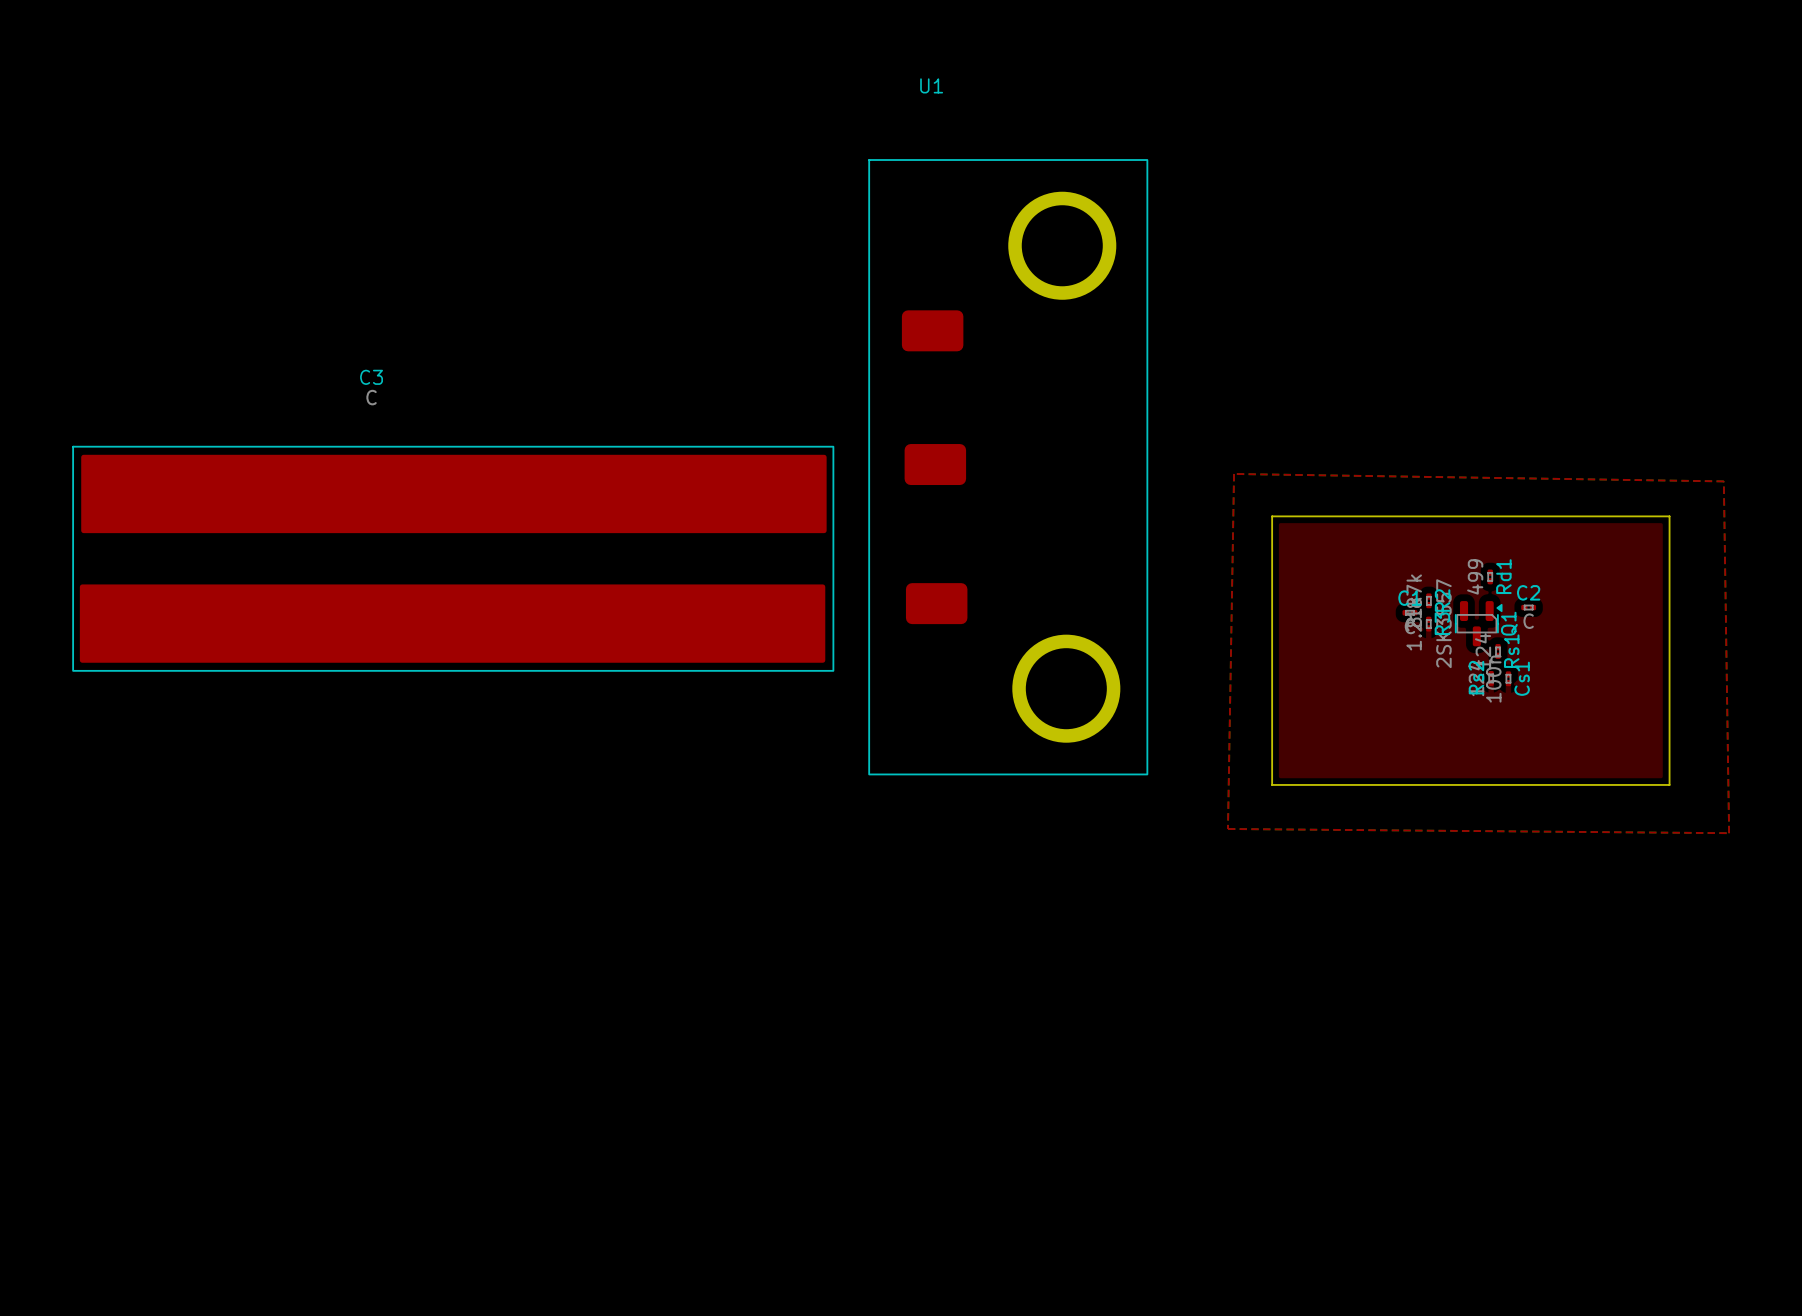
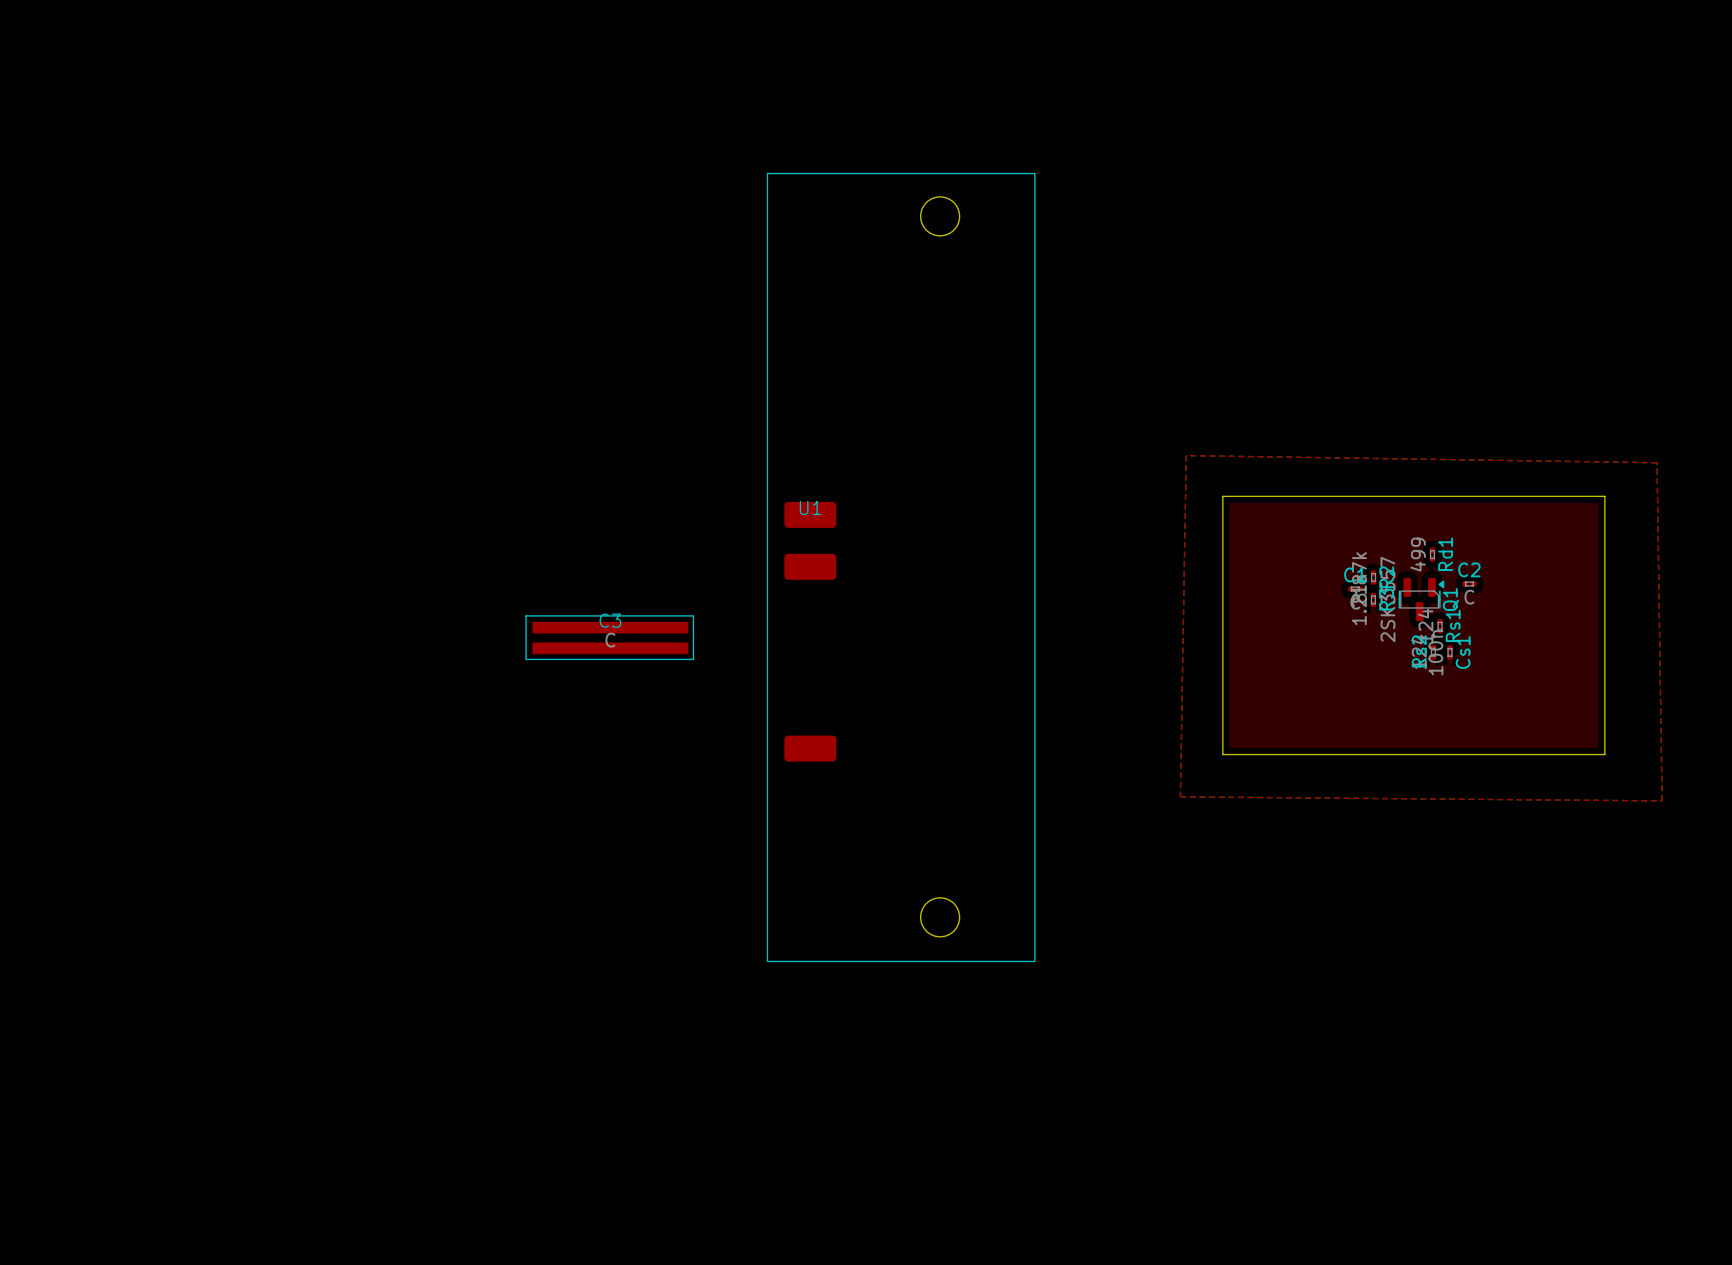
U1 name position: U1 (931, 85) -> U1 (810, 507)
U1 footprint: [868, 159, 1149, 776] -> [766, 172, 1036, 963]
C3 name position: C3 (371, 377) -> C3 (610, 620)
C3 value position: C (371, 397) -> C (610, 640)
C3 footprint: [72, 446, 835, 672] -> [525, 615, 695, 661]

